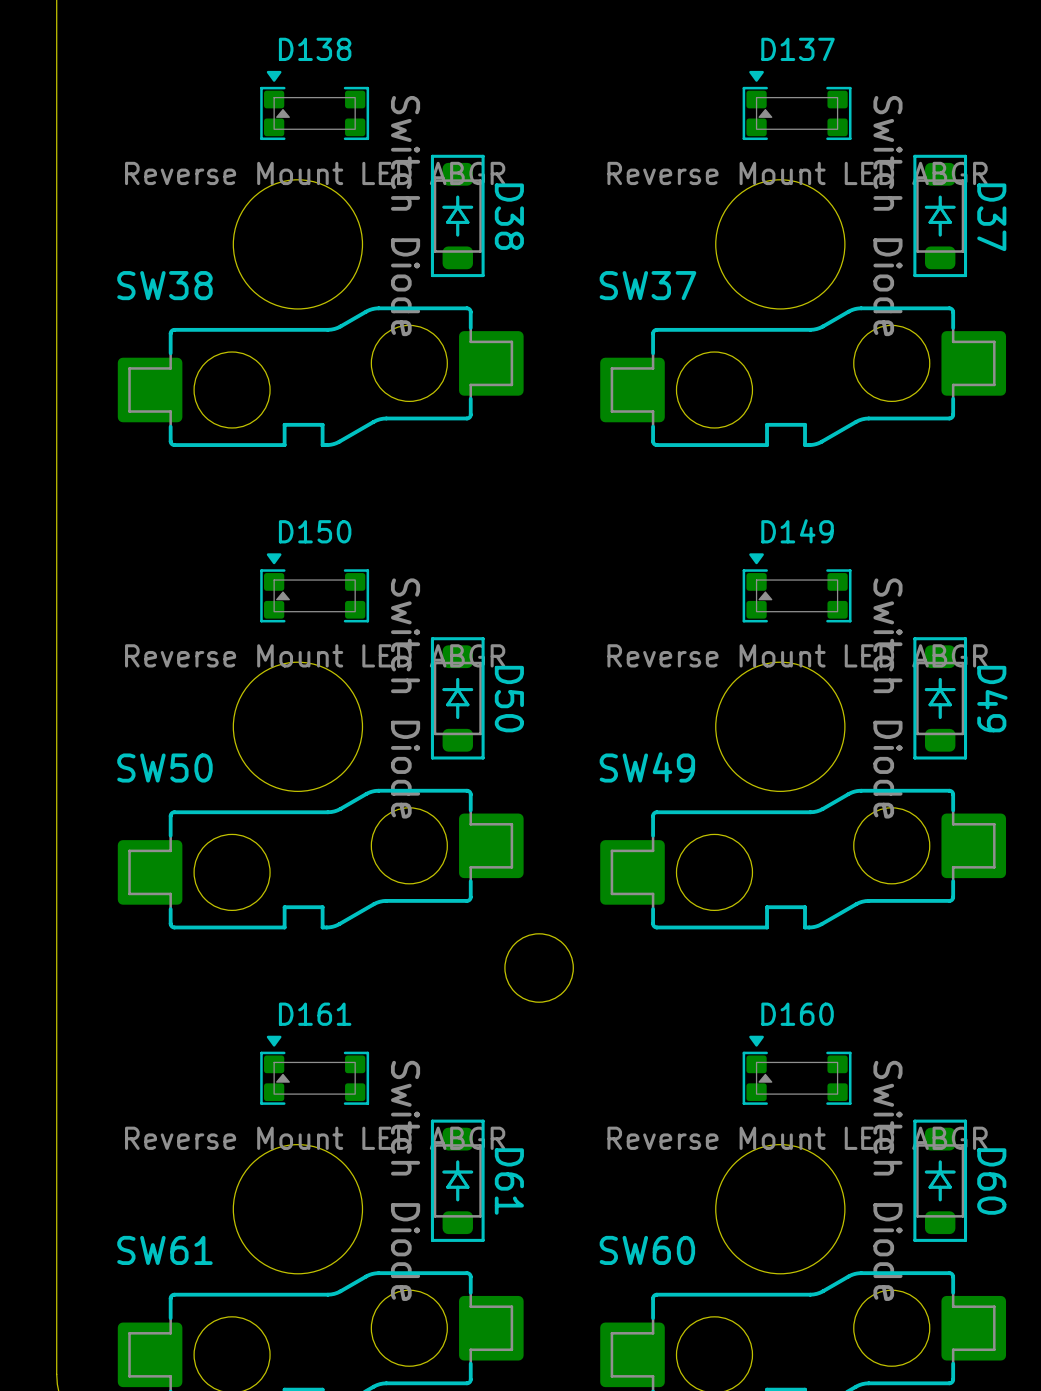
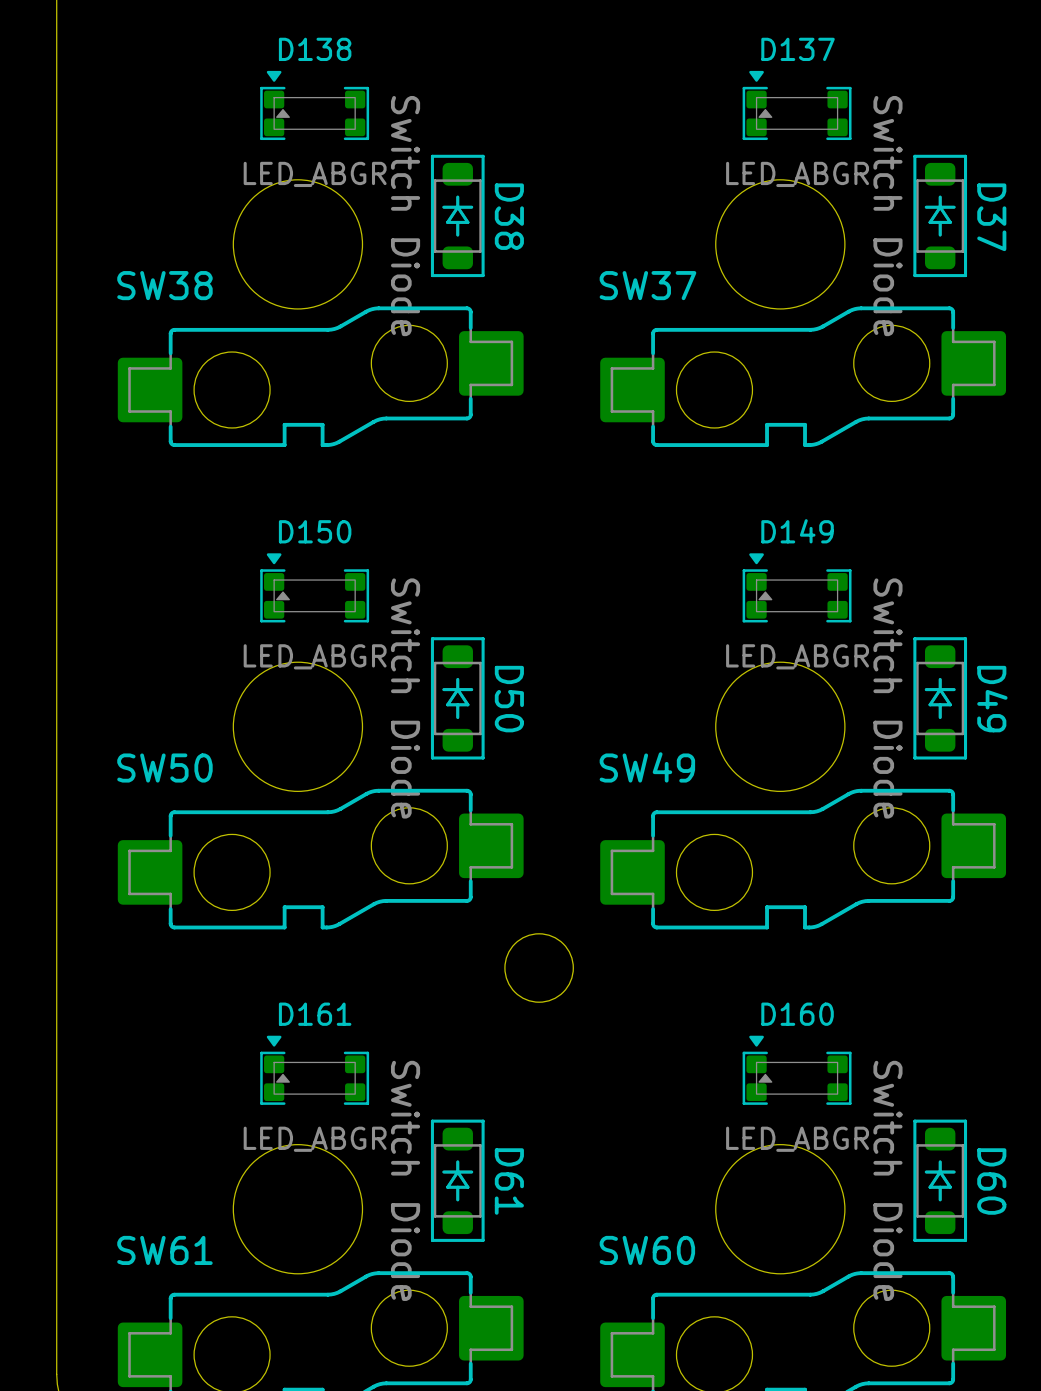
D138 value: Reverse Mount LED ABGR (315, 173) -> LED_ABGR (315, 174)
D137 value: Reverse Mount LED ABGR (797, 173) -> LED_ABGR (797, 174)
D150 value: Reverse Mount LED ABGR (315, 655) -> LED_ABGR (315, 656)
D149 value: Reverse Mount LED ABGR (797, 655) -> LED_ABGR (797, 656)
D161 value: Reverse Mount LED ABGR (315, 1138) -> LED_ABGR (315, 1139)
D160 value: Reverse Mount LED ABGR (797, 1138) -> LED_ABGR (797, 1139)

